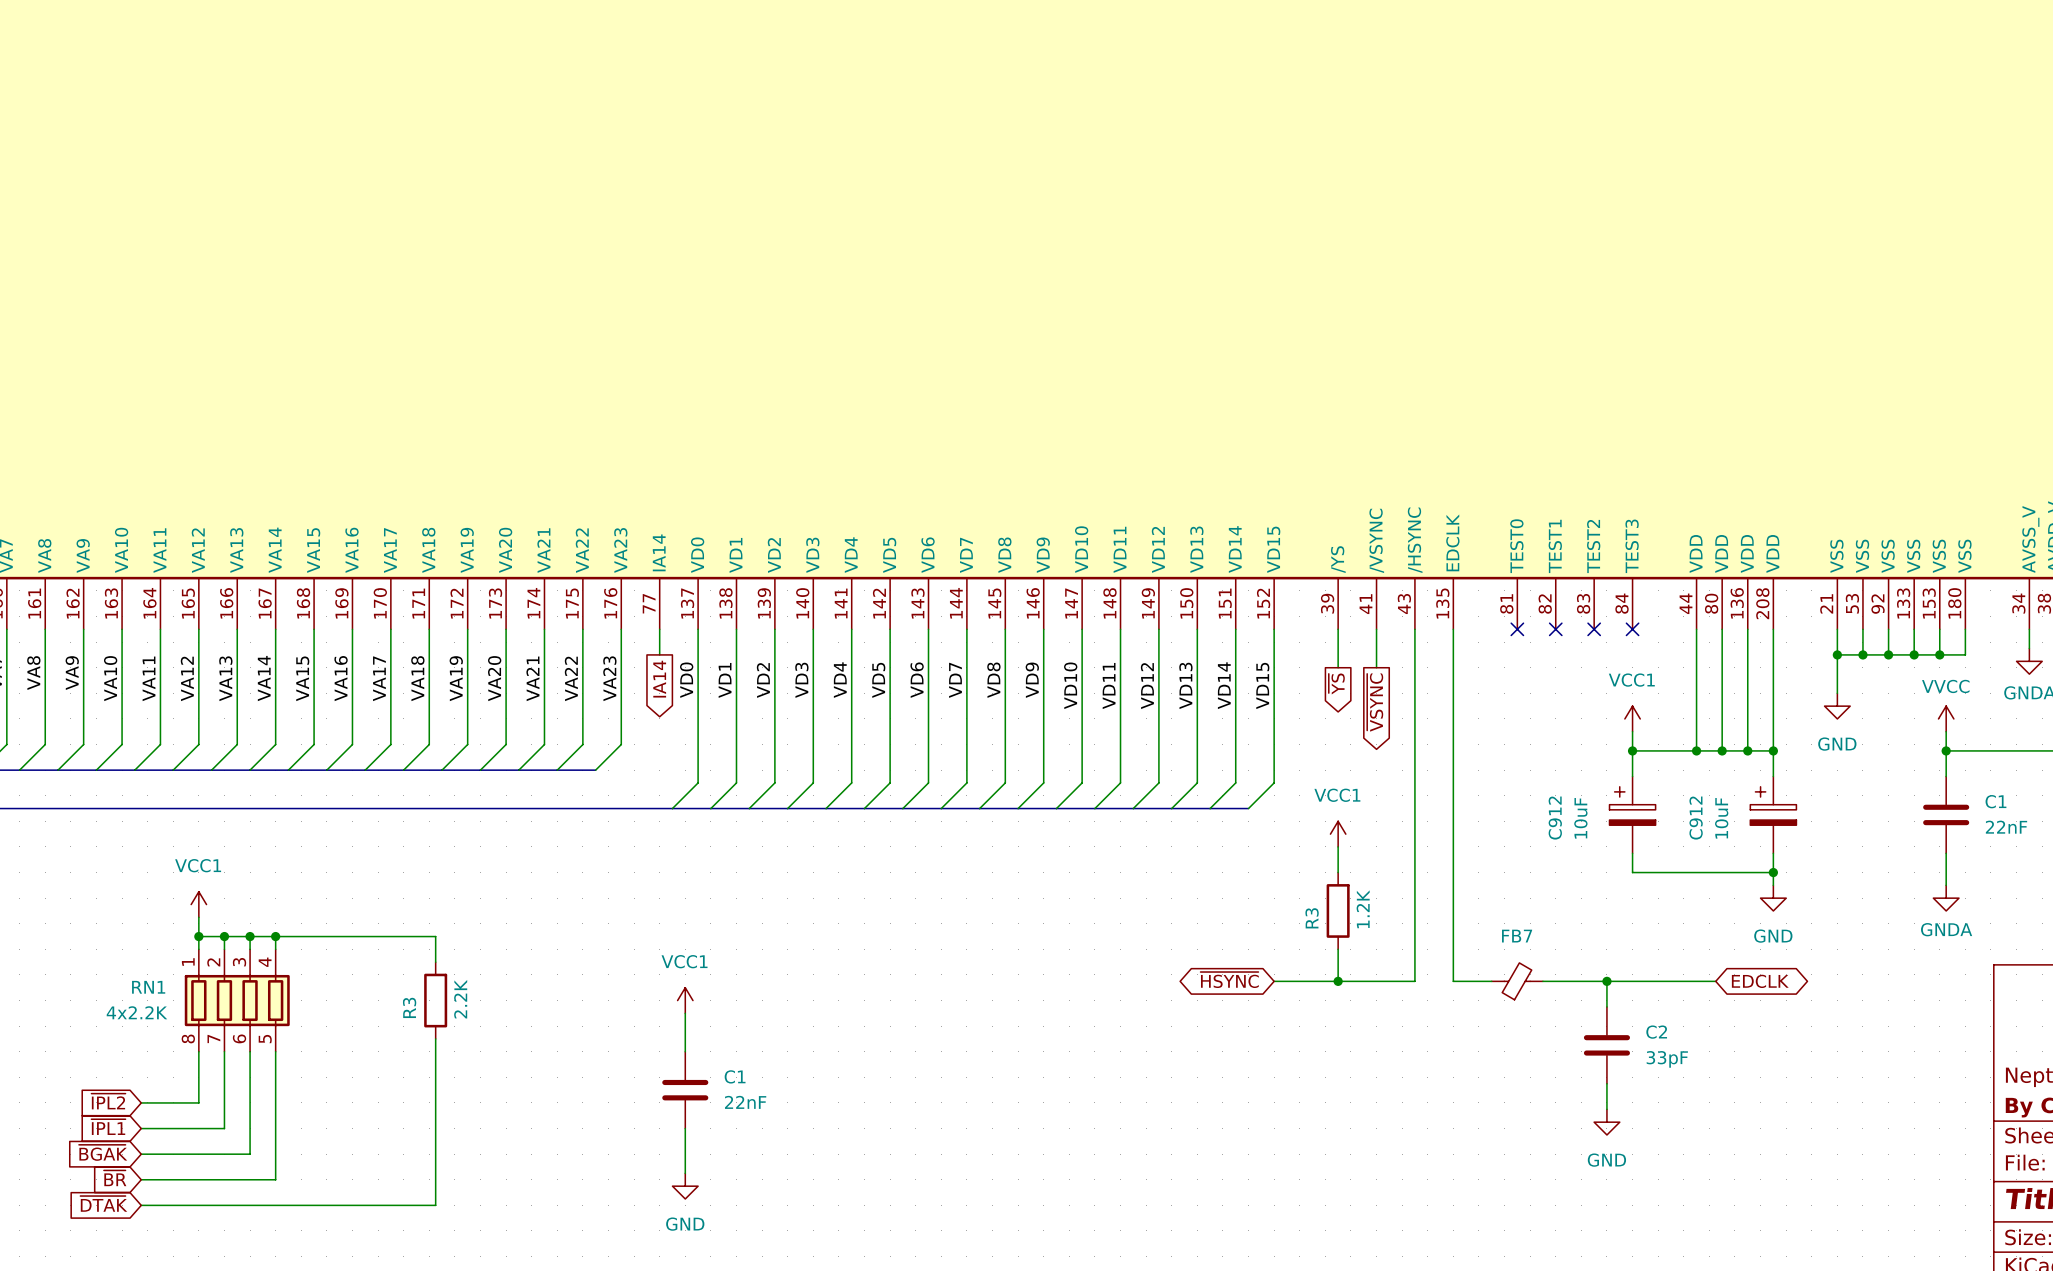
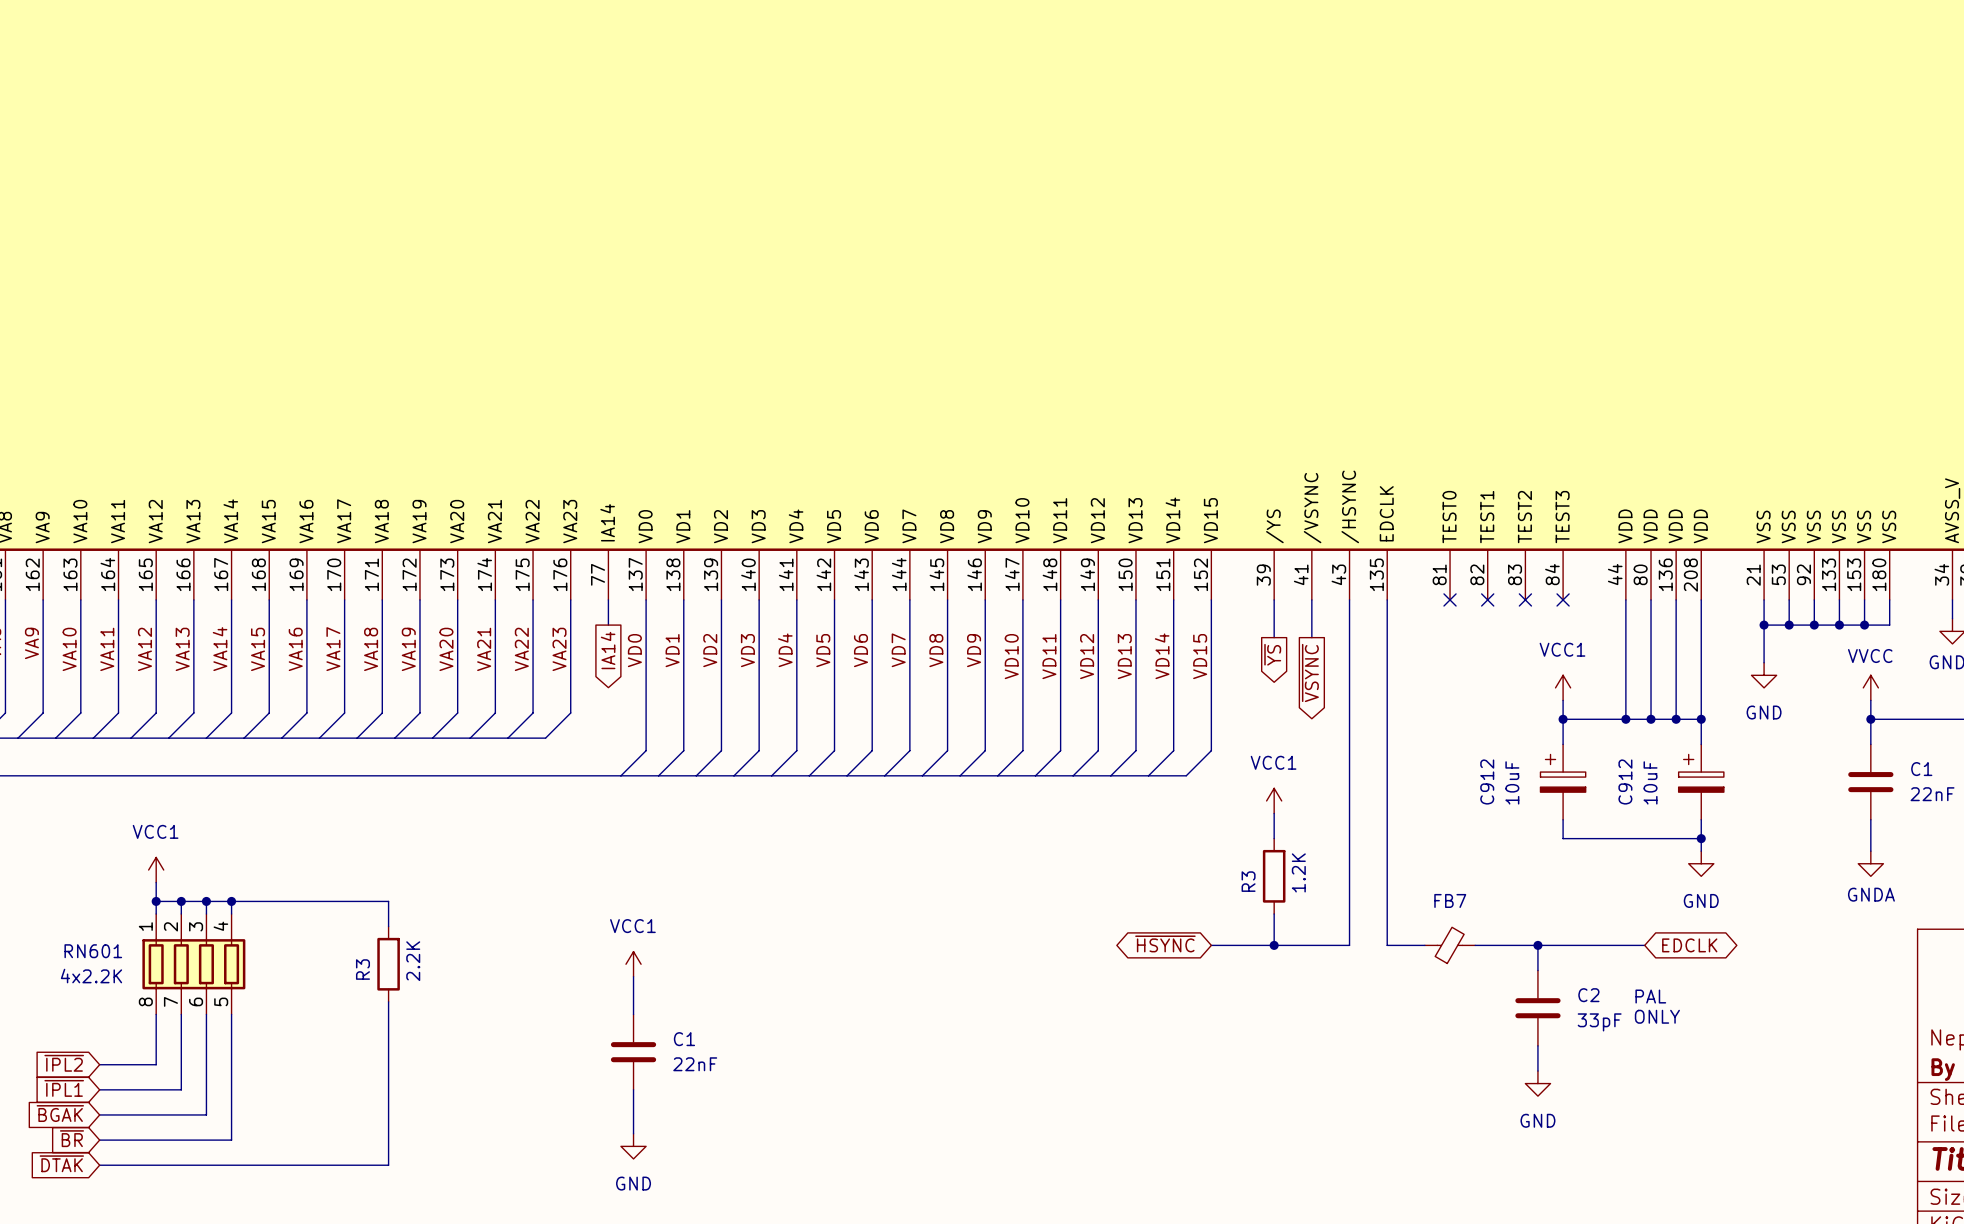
RN1 name: RN1 (148, 987) -> RN601 (93, 951)
text: none -> PAL (1650, 996)
text: none -> ONLY (1657, 1016)

